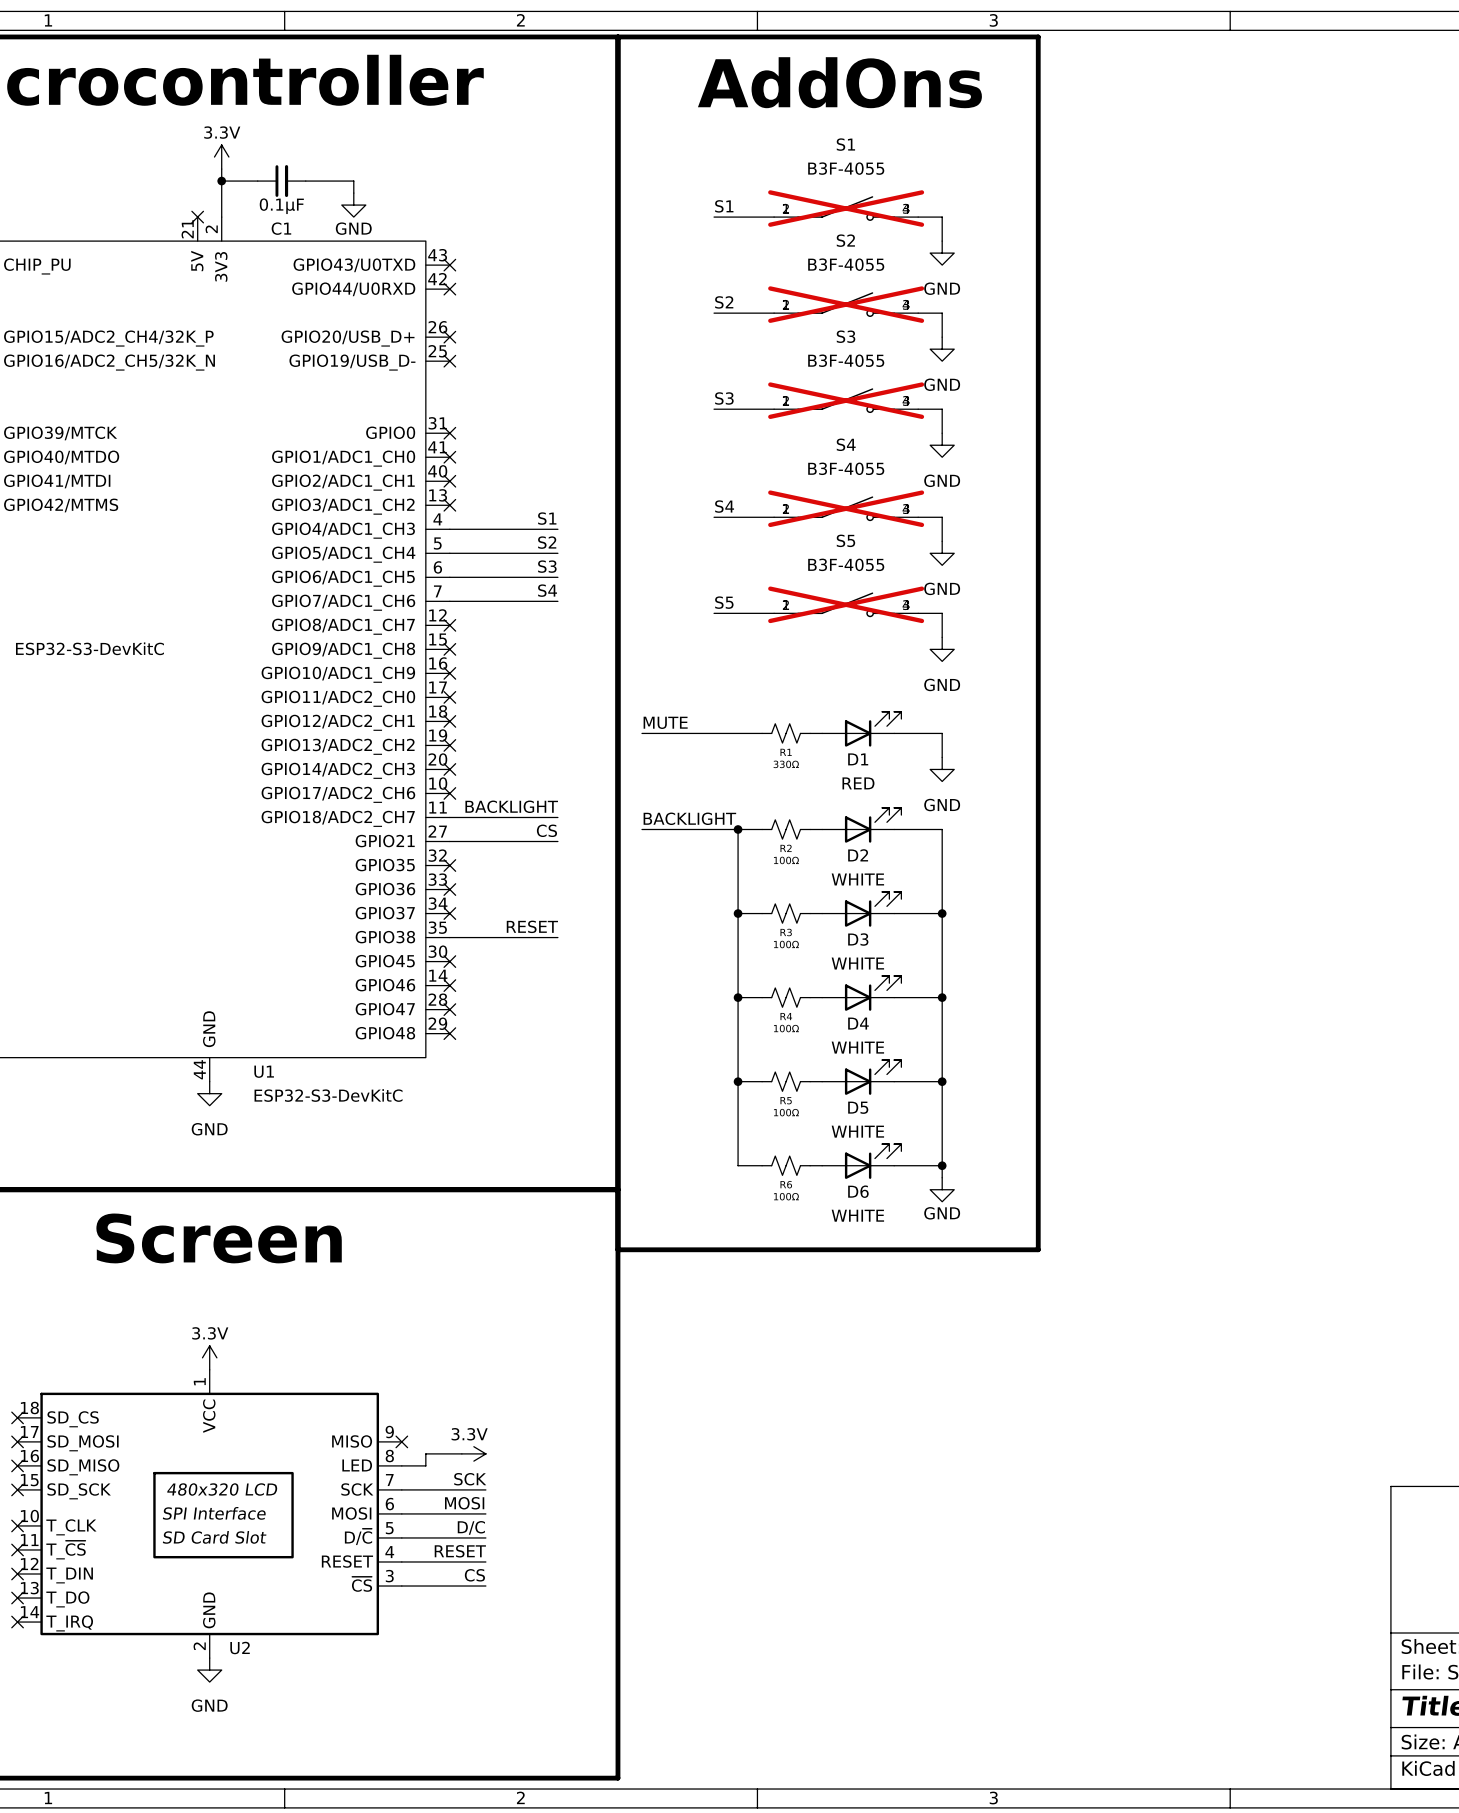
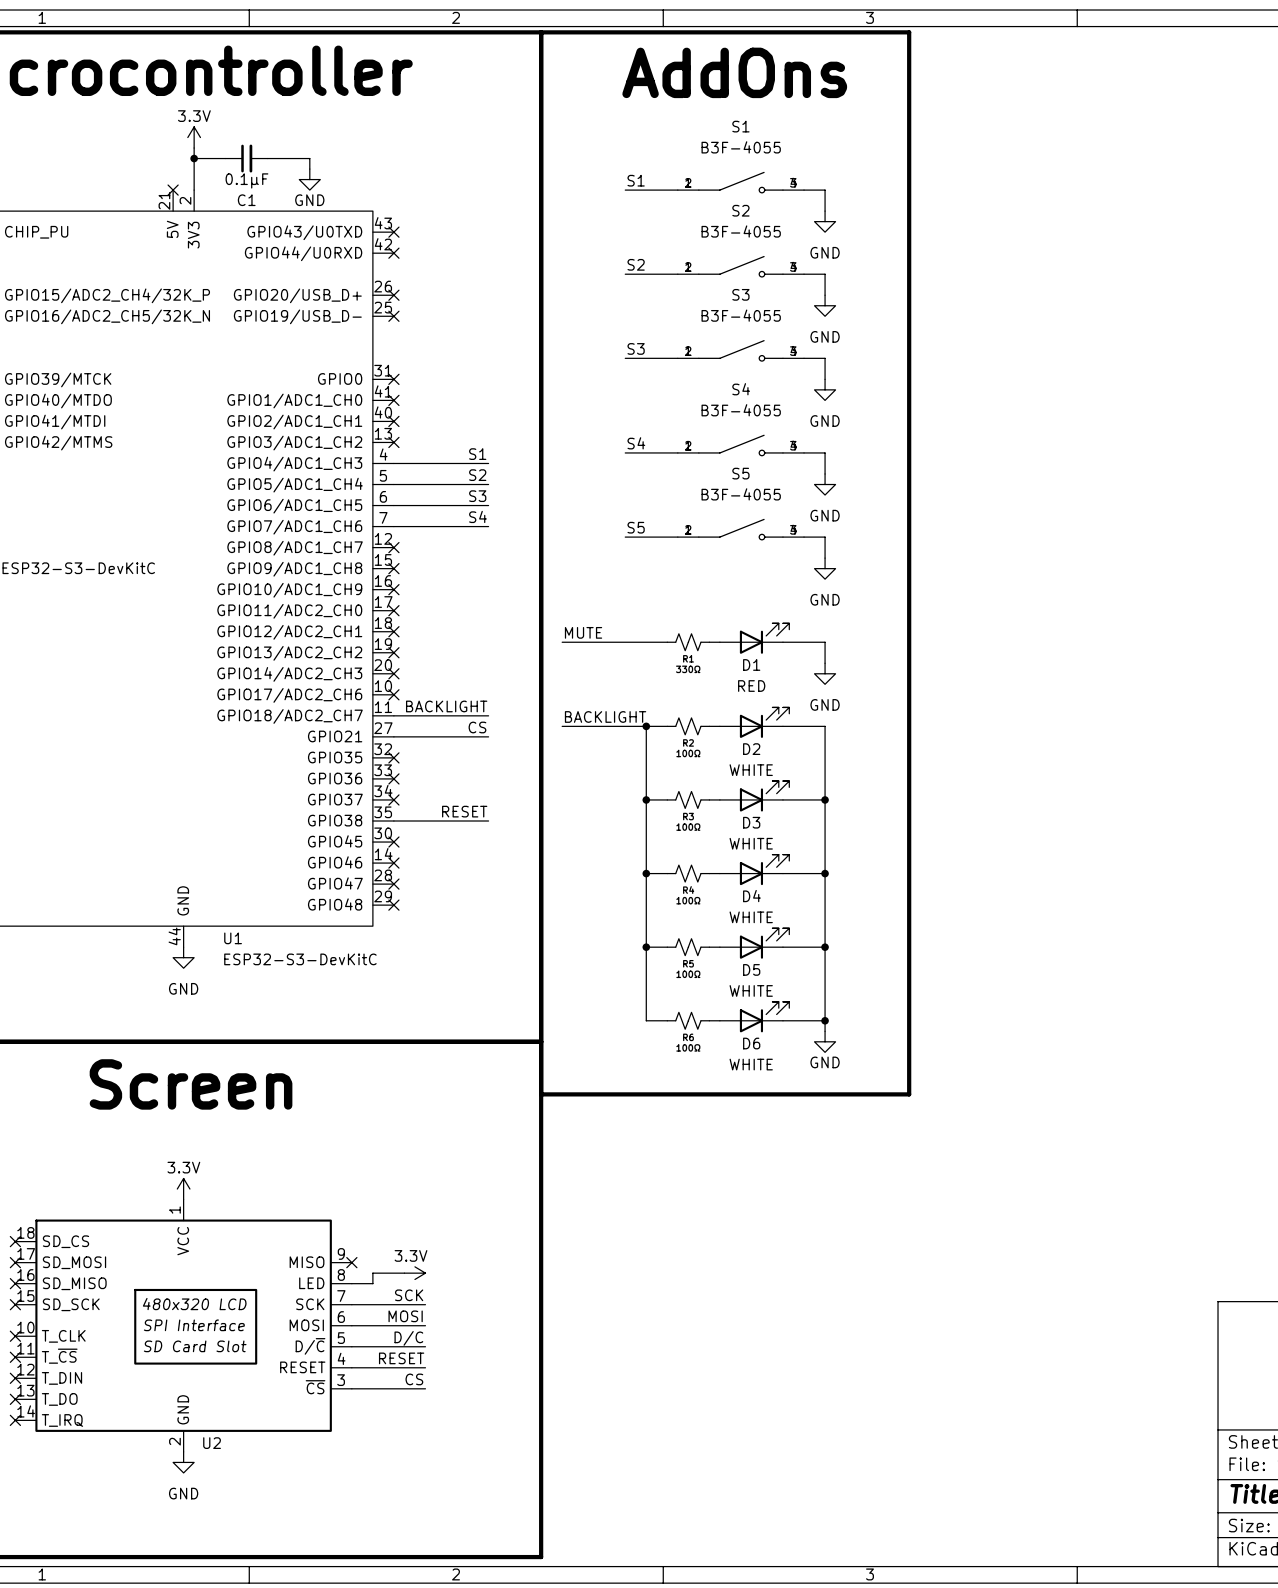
S1 do-not-place cross: (846, 208) -> none
S2 do-not-place cross: (846, 304) -> none
S3 do-not-place cross: (846, 400) -> none
S4 do-not-place cross: (846, 508) -> none
S5 do-not-place cross: (846, 604) -> none

